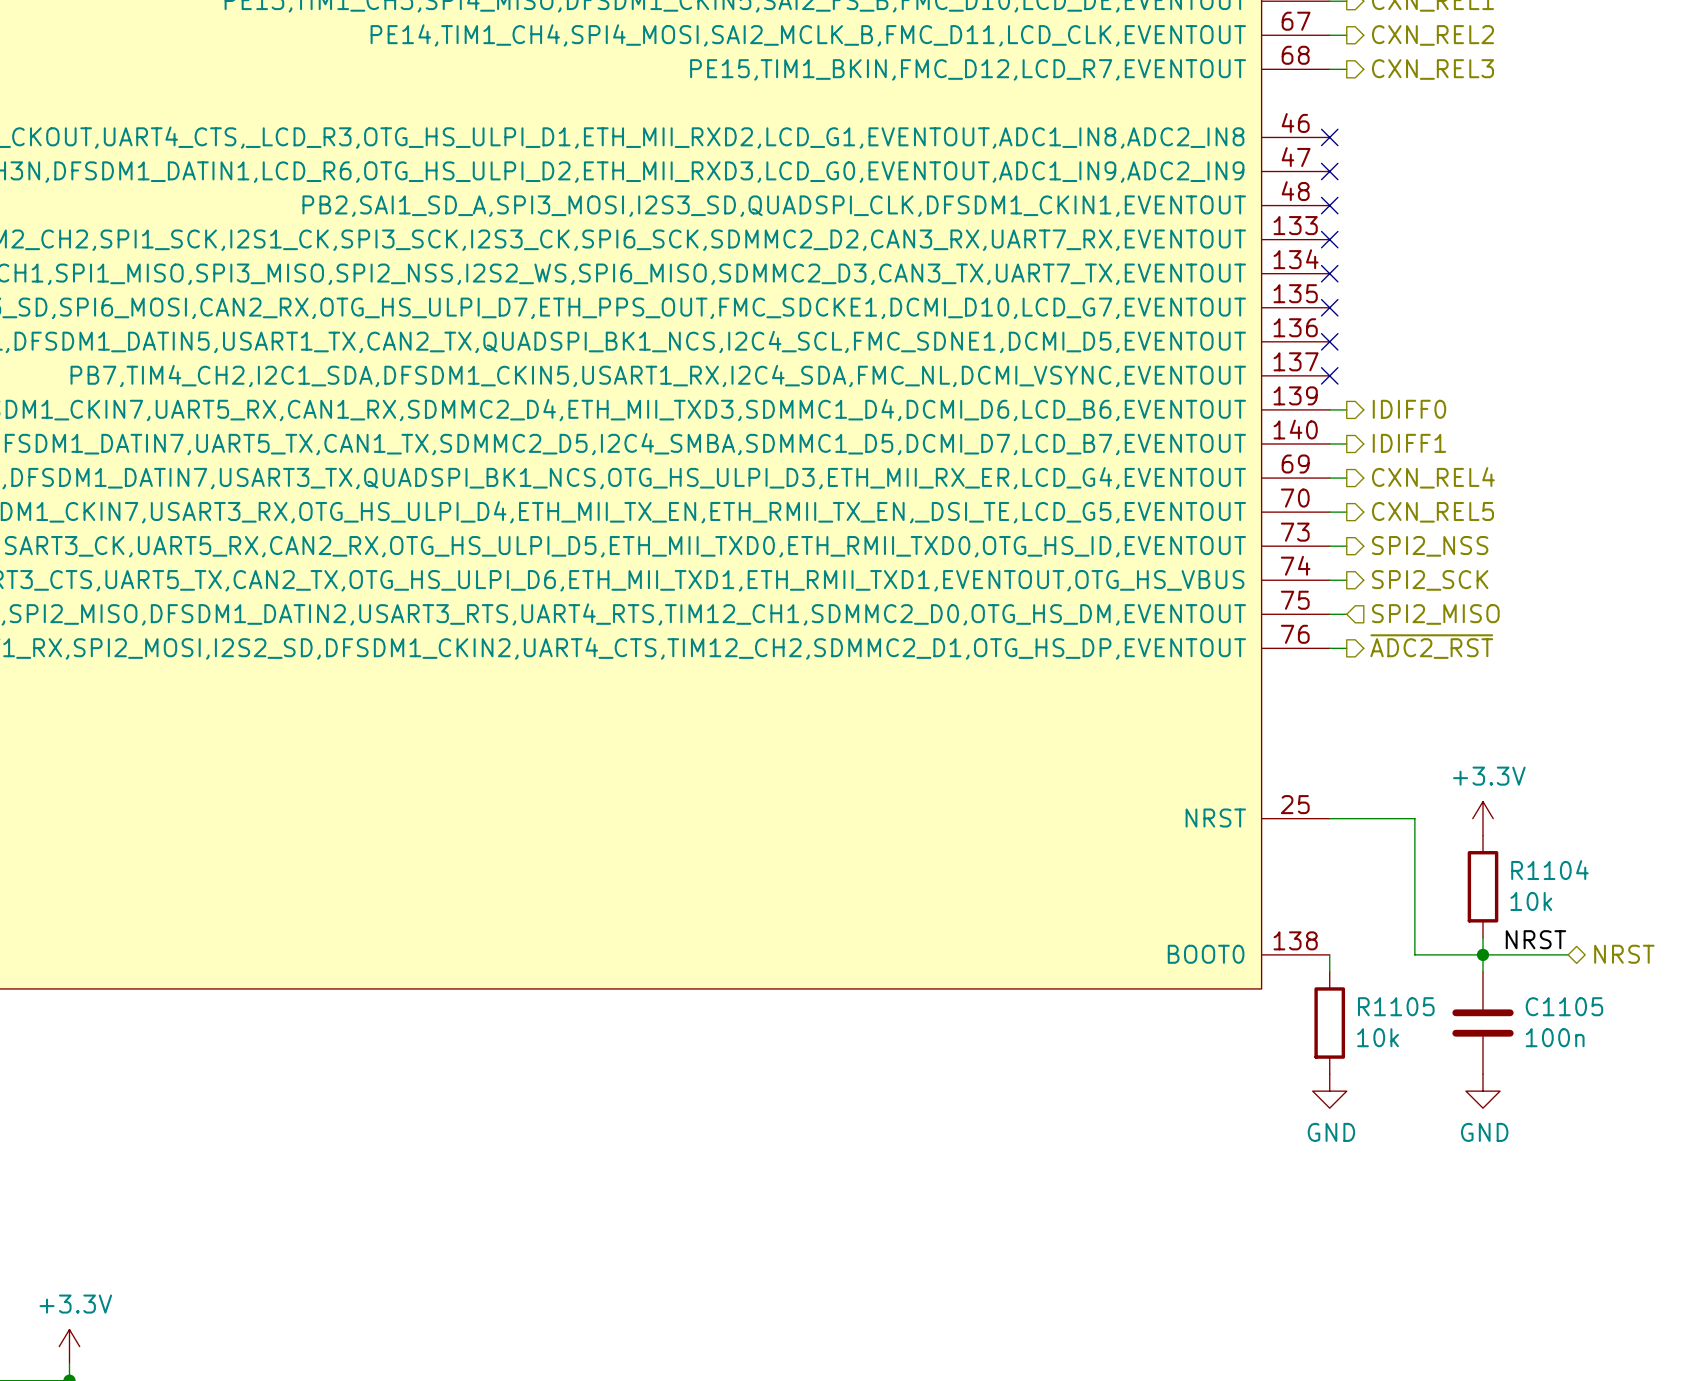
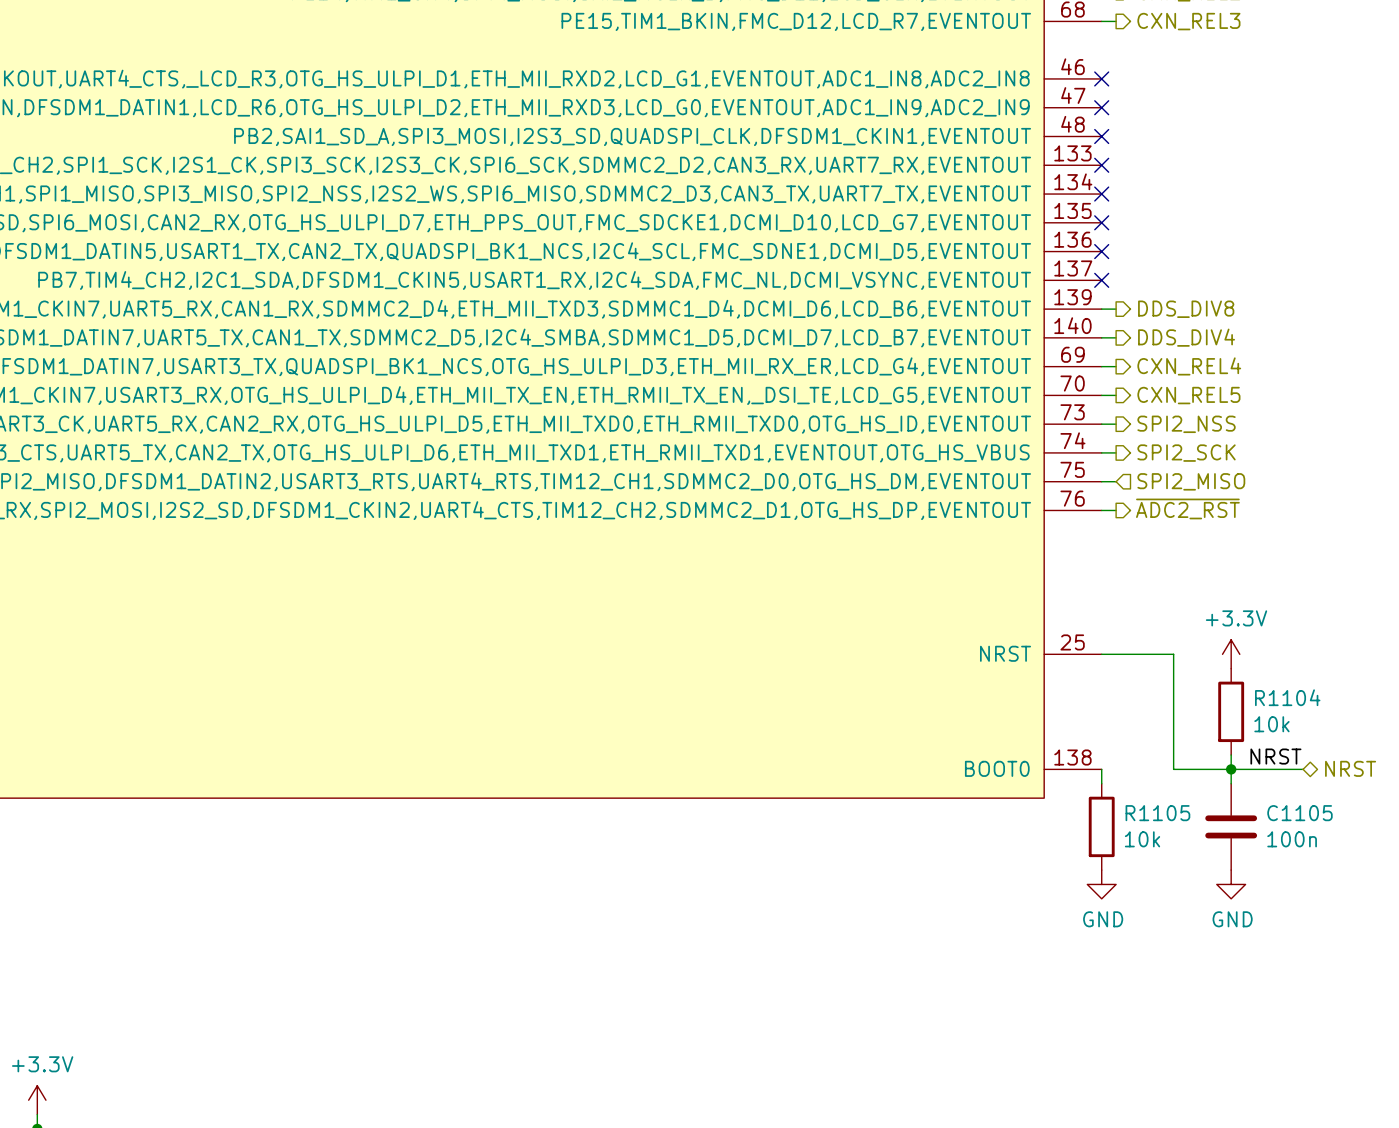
hierarchical label: IDIFF0 (1409, 409) -> DDS_DIV8 (1186, 309)
hierarchical label: IDIFF1 (1409, 443) -> DDS_DIV4 (1186, 337)

